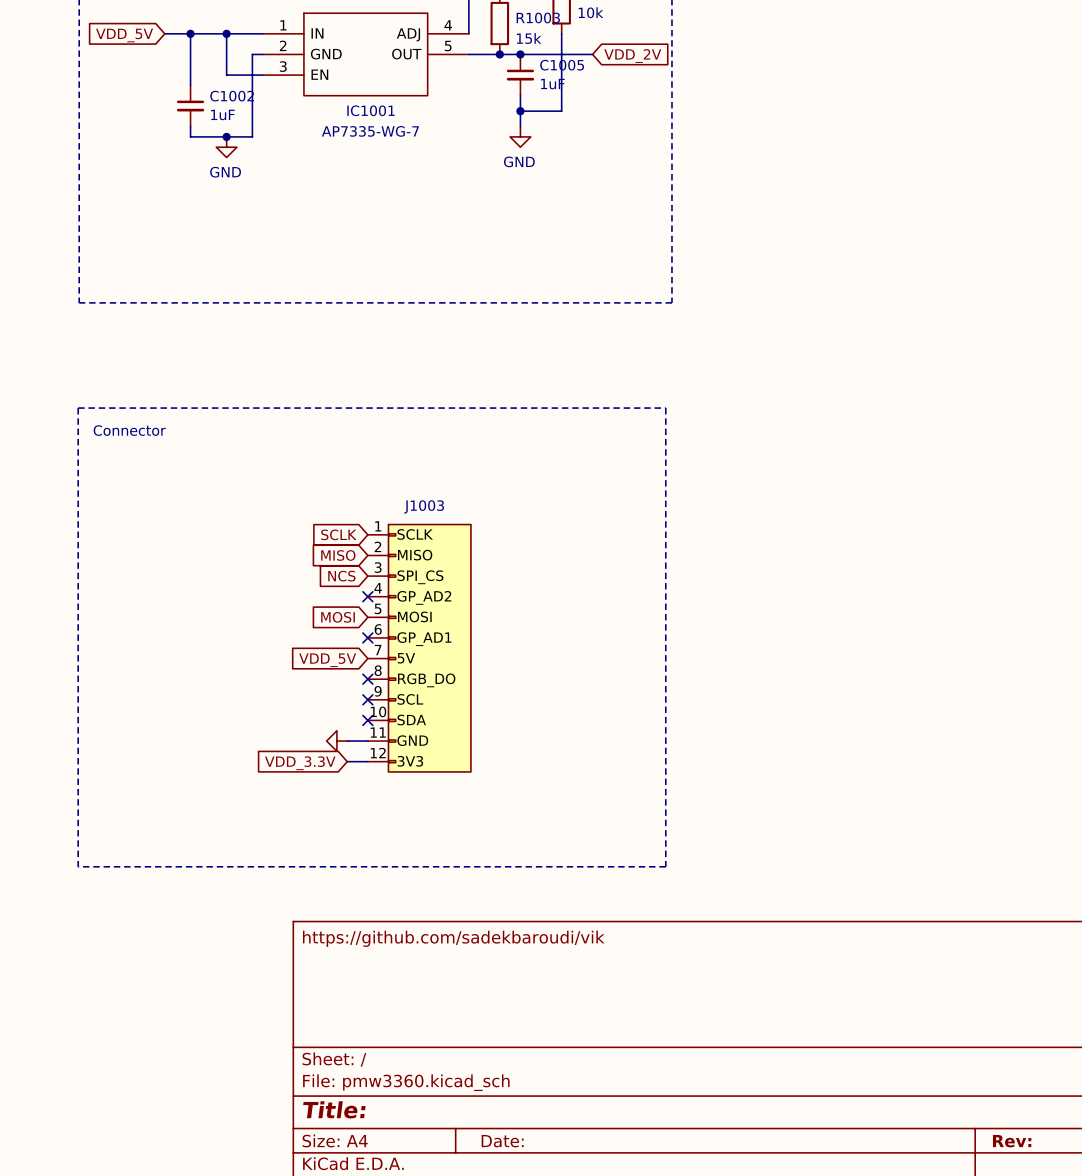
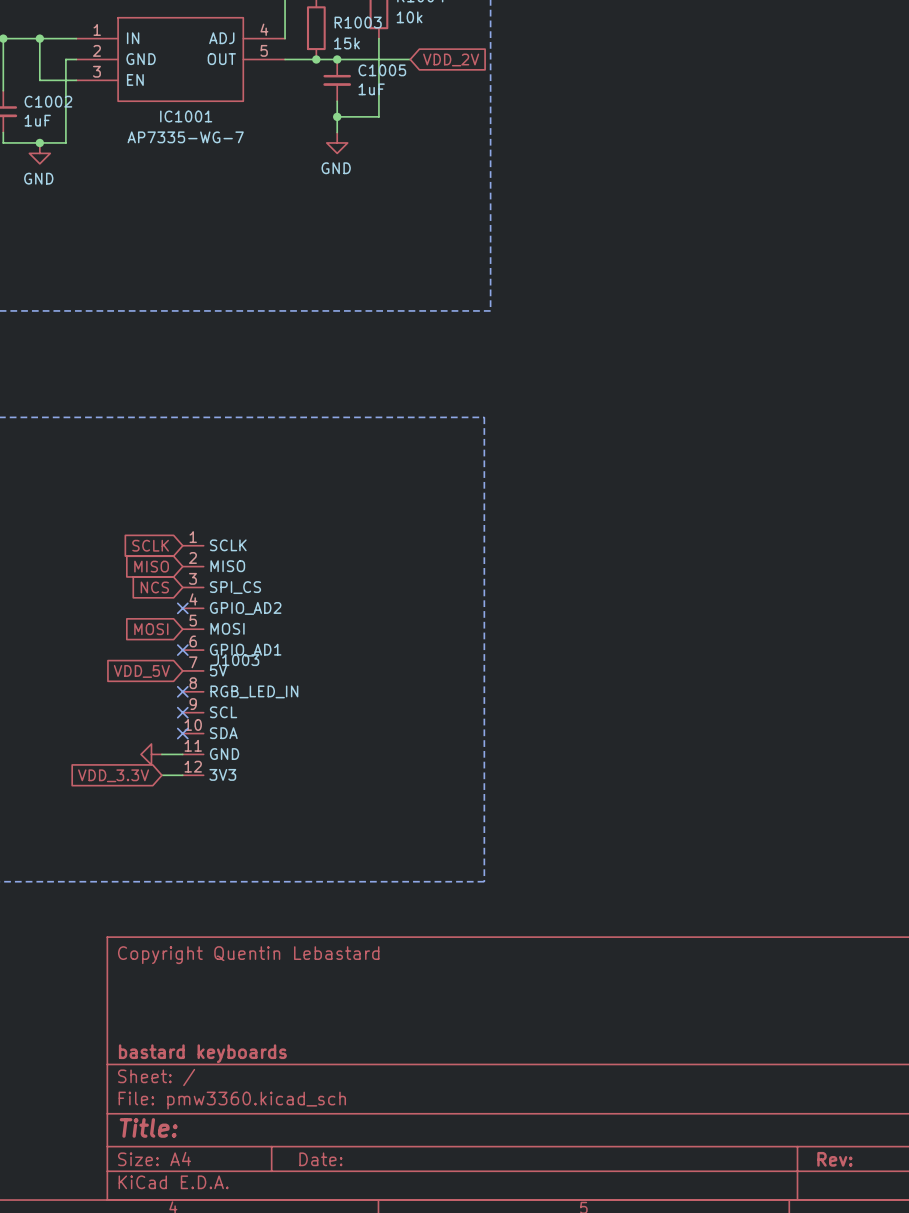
J1003 name position: J1003 (424, 506) -> J1003 (236, 660)
J1003 symbol: [367, 524, 471, 772] -> [182, 545, 204, 776]
title block: https://github.com/sadekbaroudi/vik (453, 938) -> Copyright Quentin Lebastard (248, 955)
title block: none -> bastard keyboards (202, 1053)

